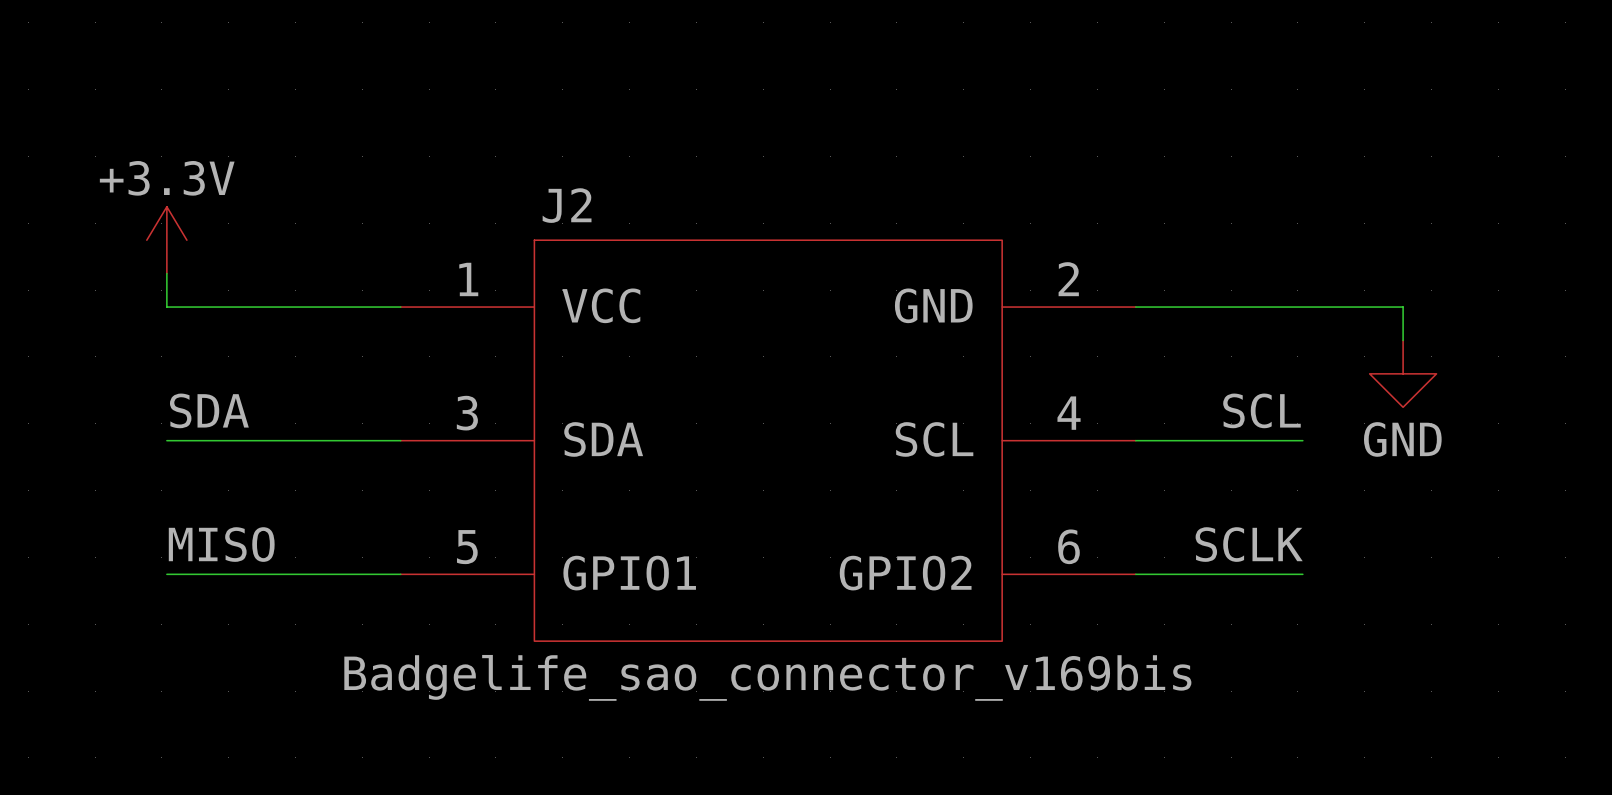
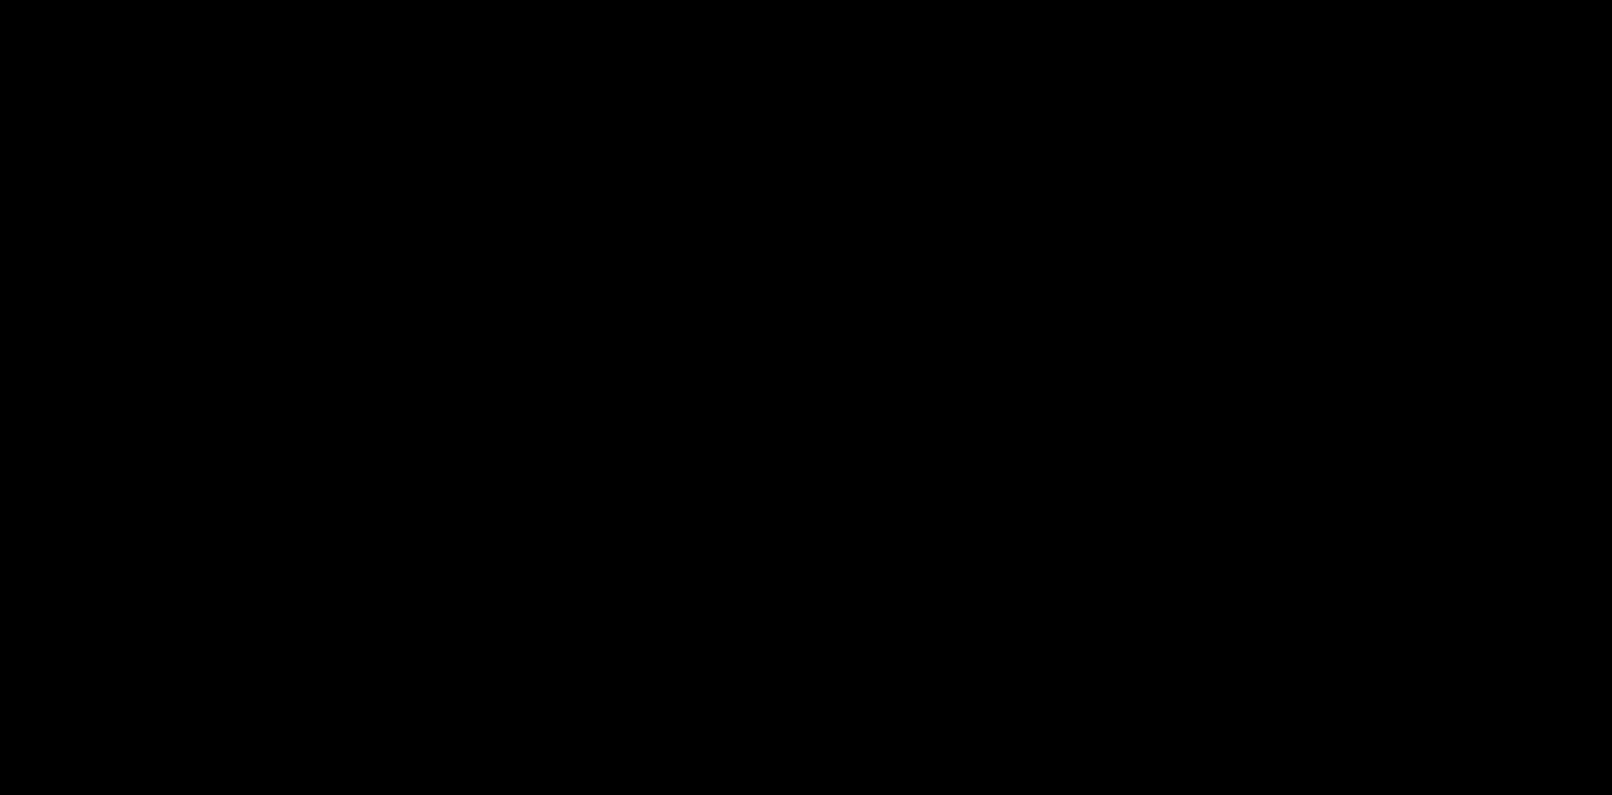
power symbol: +3.3V (166, 240) -> none
wire: (166, 273) (166, 307) (400, 307) -> none
wire: (1135, 307) (1403, 307) (1403, 340) -> none
power symbol: GND (1403, 373) -> none
label: SDA (209, 410) -> none
label: SCL (1261, 410) -> none
wire: (166, 440) (400, 440) -> none
J2: Badgelife_sao_connector_v169bis (768, 440) -> none
wire: (1135, 440) (1302, 440) -> none
label: MISO (221, 544) -> none
label: SCLK (1249, 544) -> none
wire: (166, 574) (400, 574) -> none
wire: (1135, 574) (1302, 574) -> none

